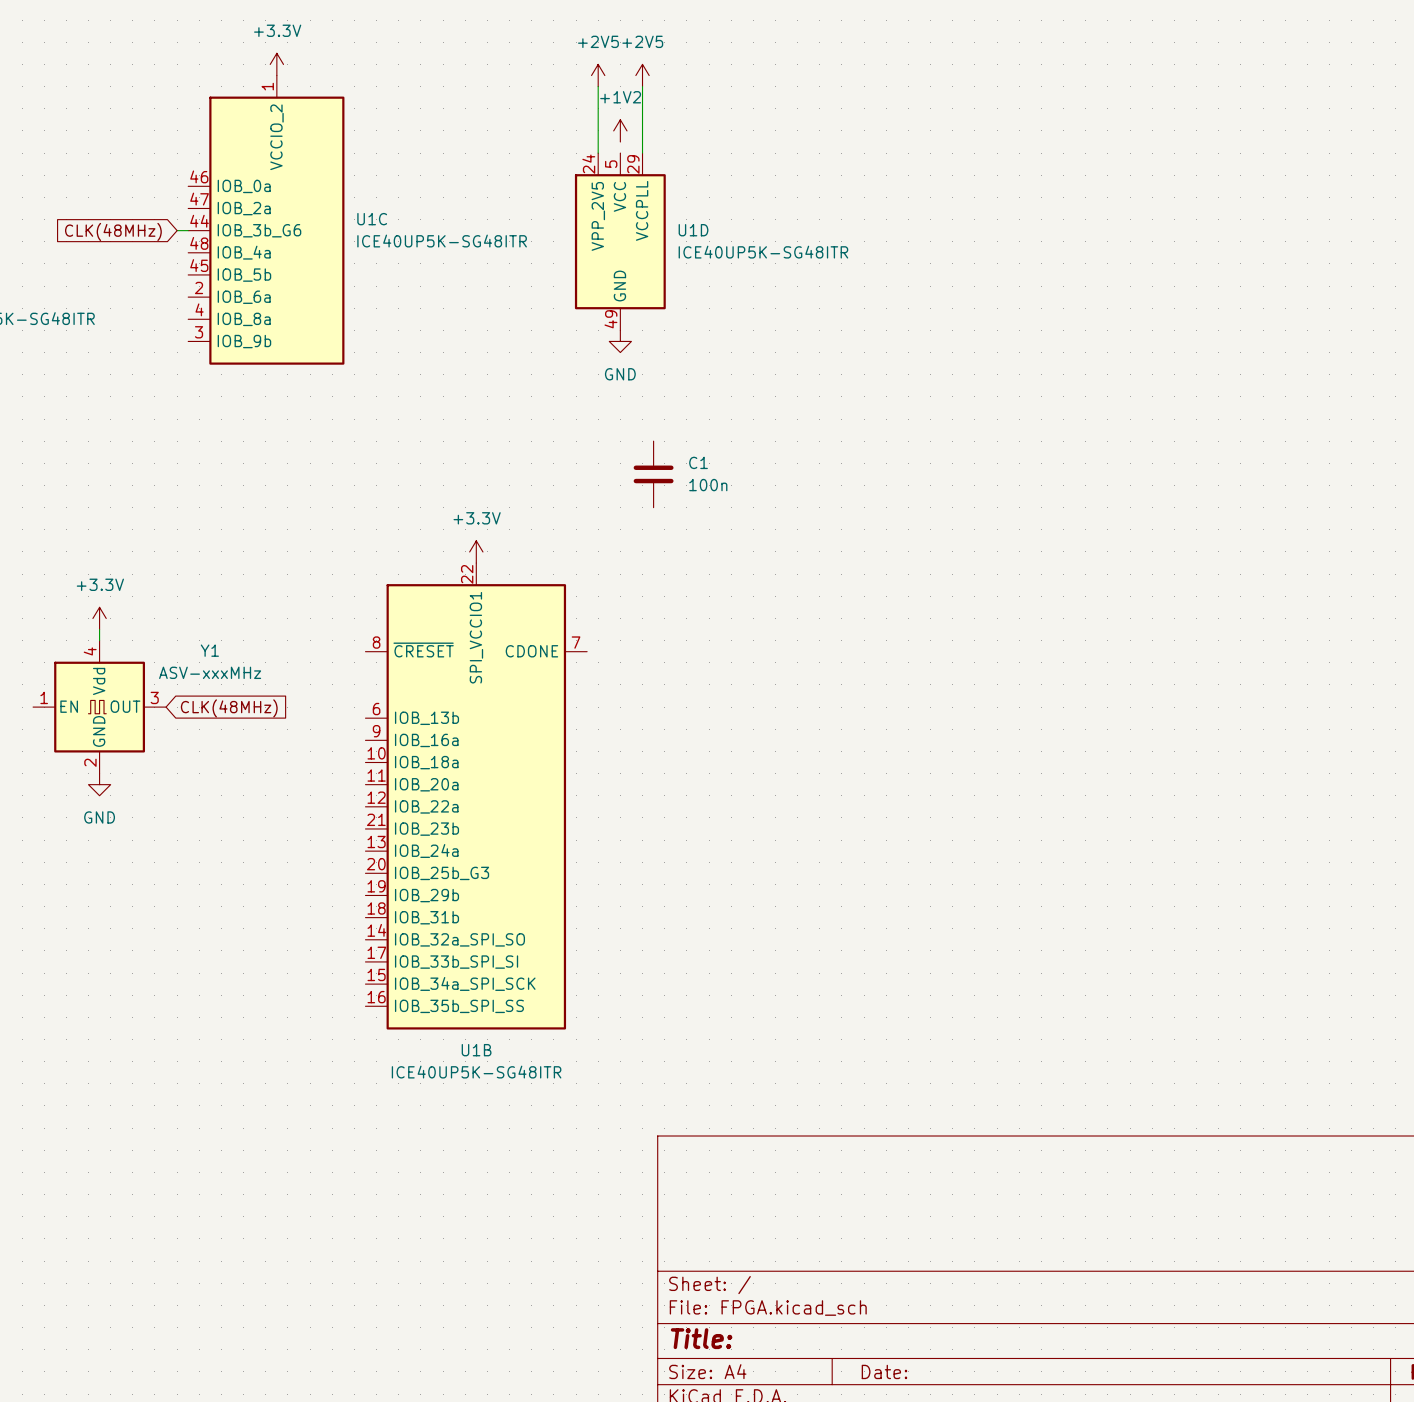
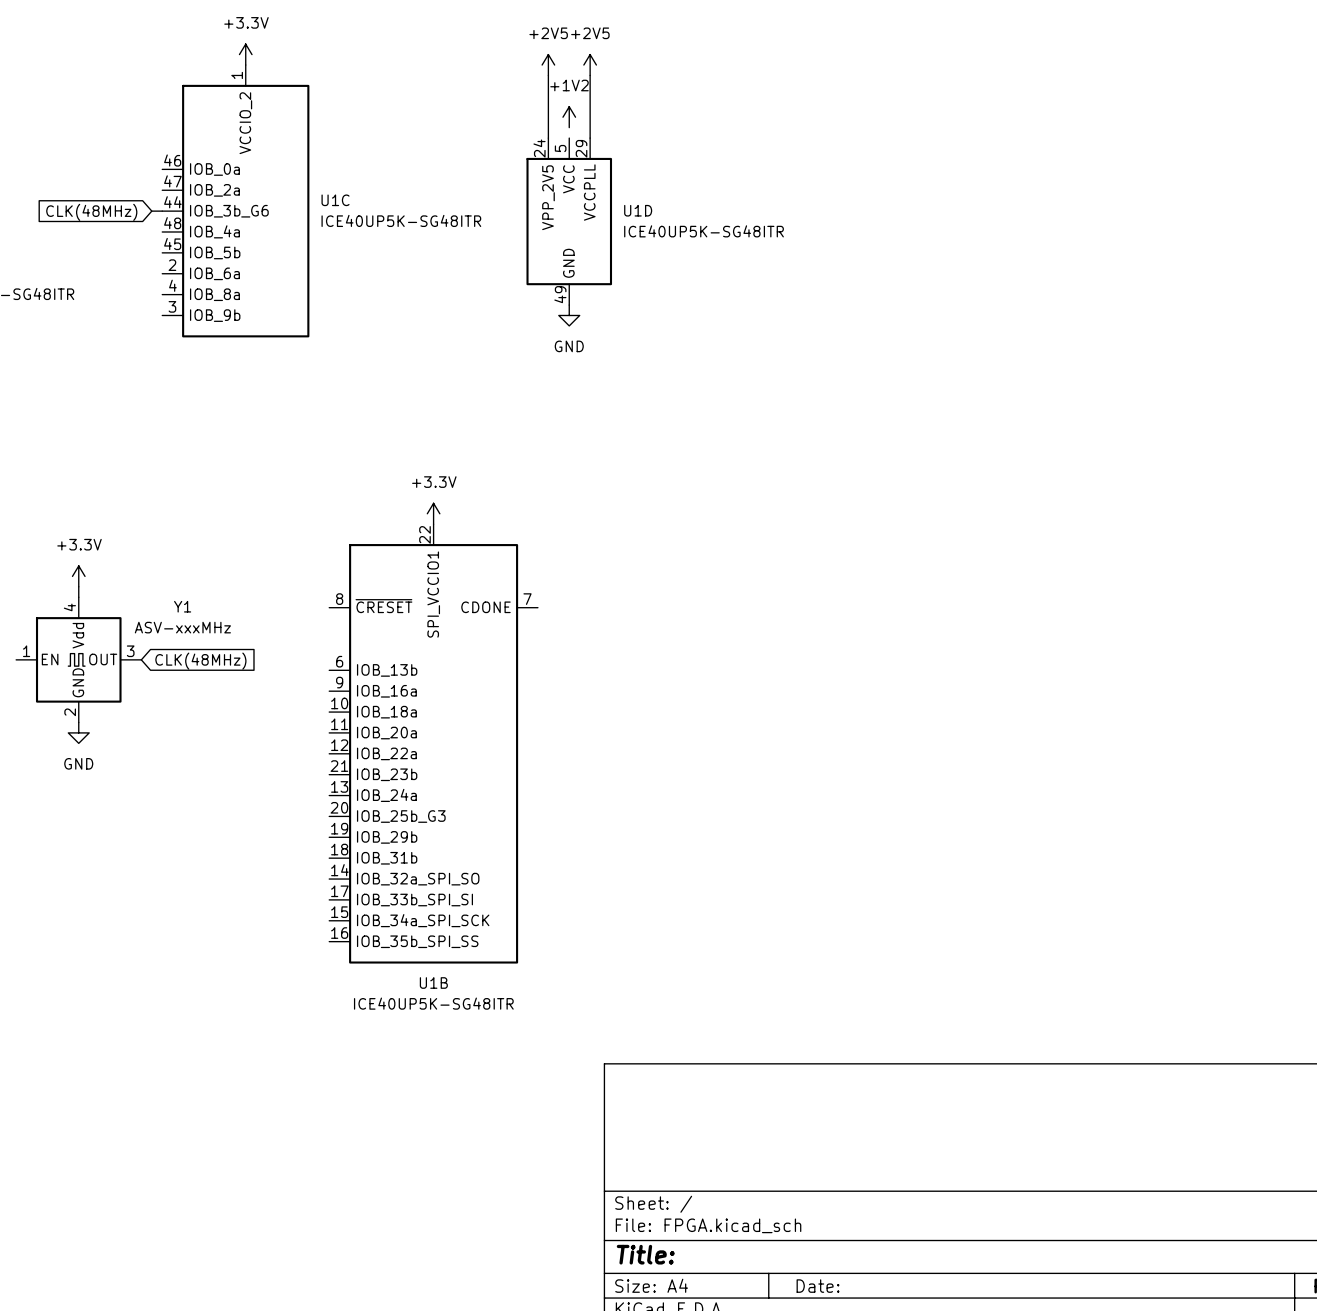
C1: 100n (653, 474) -> none

